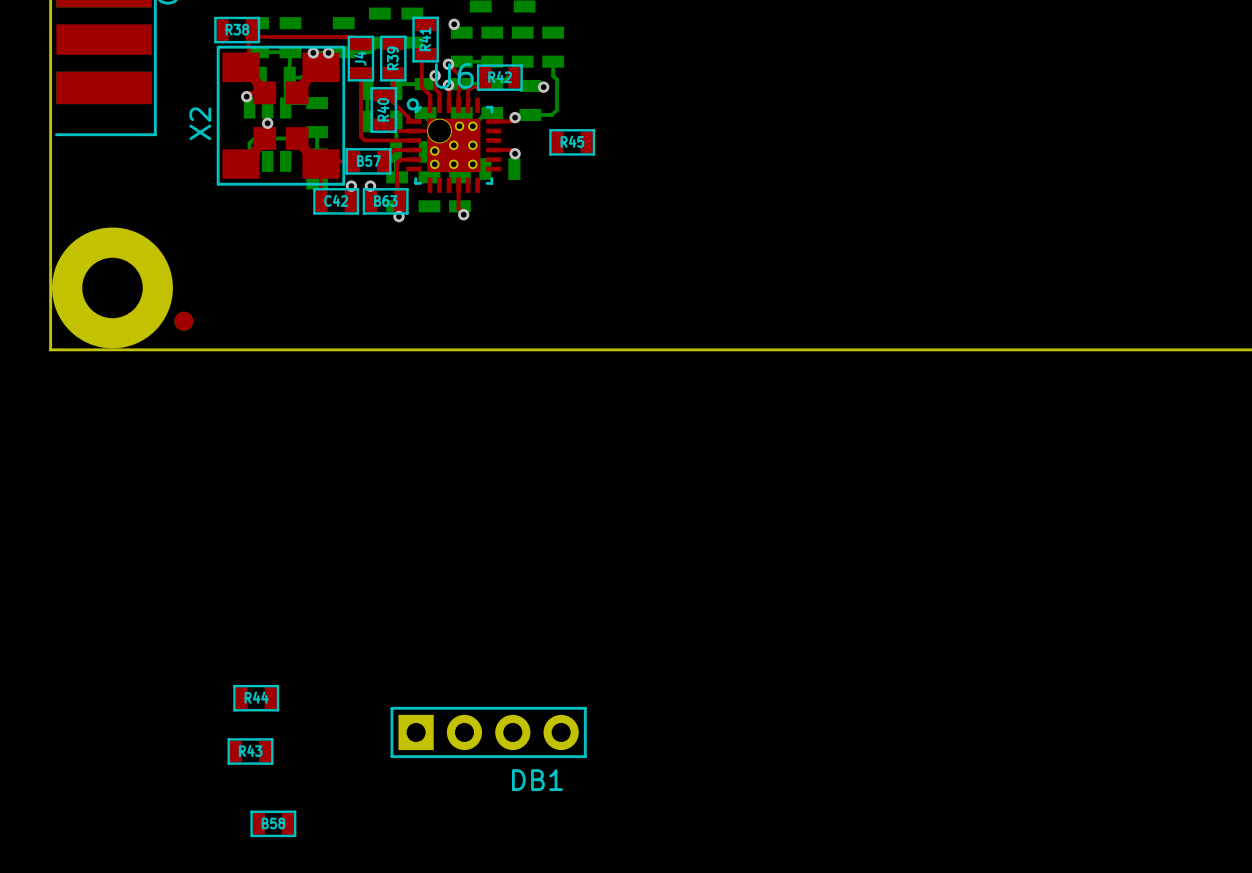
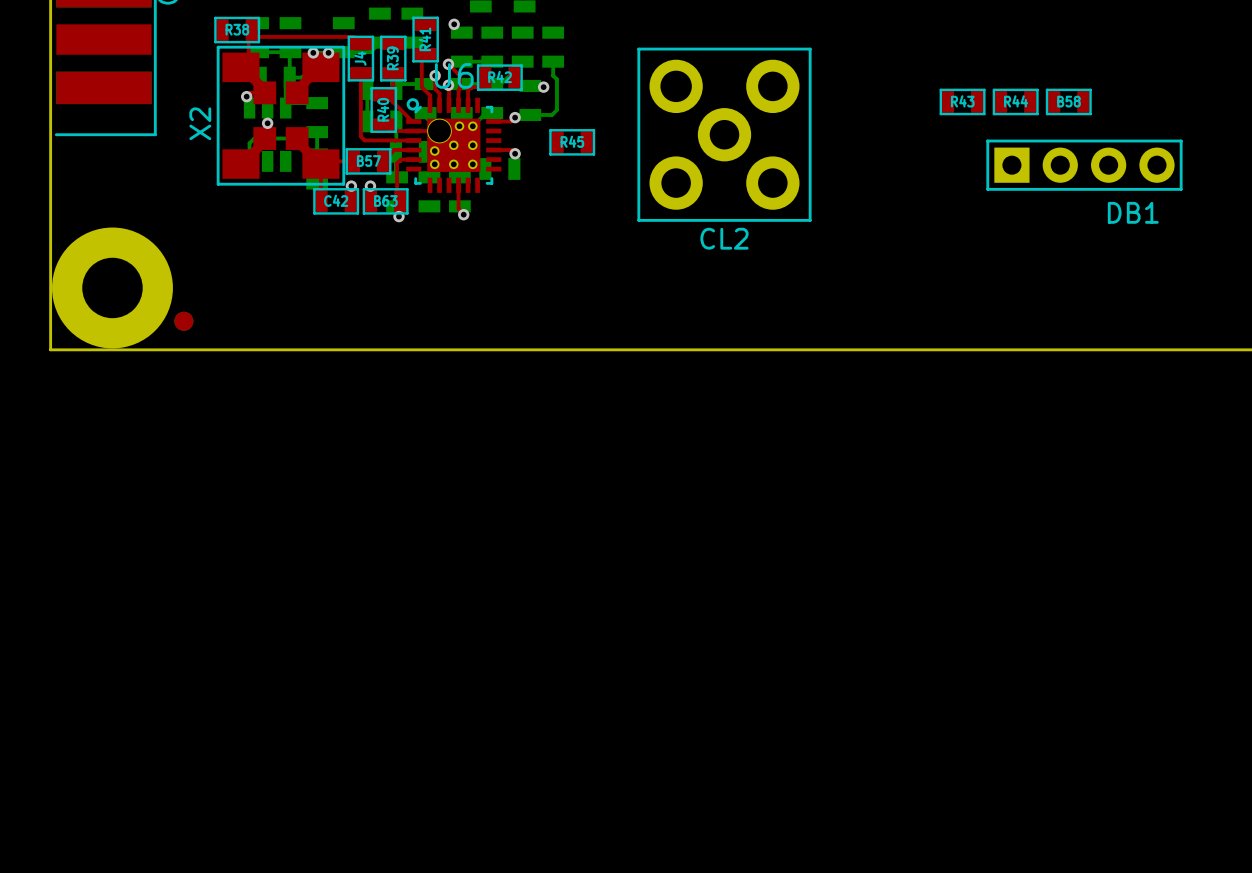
CL2: none -> (724, 134)
R44 position: (256, 698) -> (1015, 101)
DB1 position: (488, 732) -> (1084, 165)
R43 position: (250, 751) -> (962, 101)
B58 position: (273, 823) -> (1068, 101)

